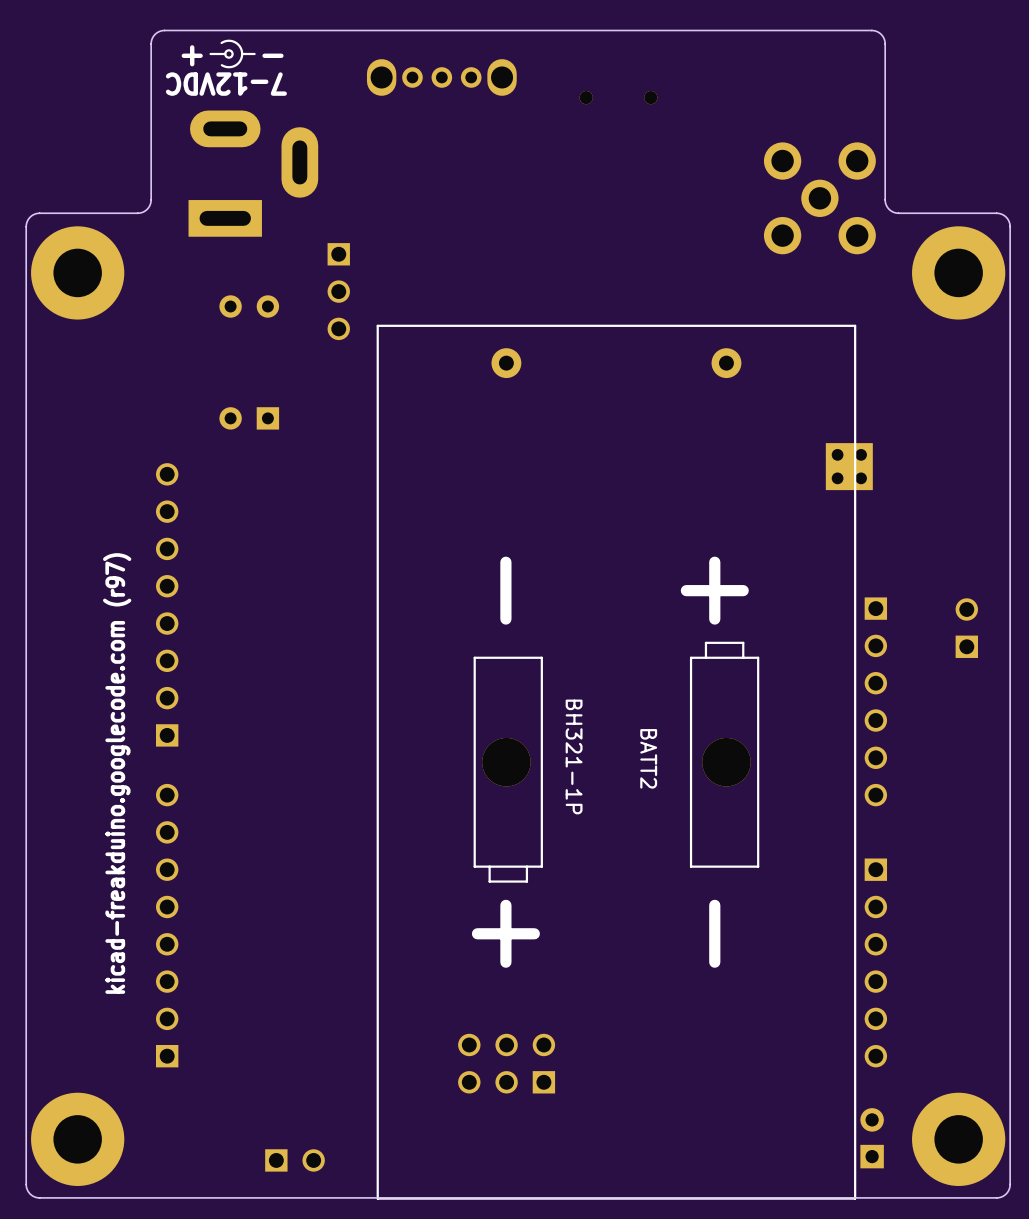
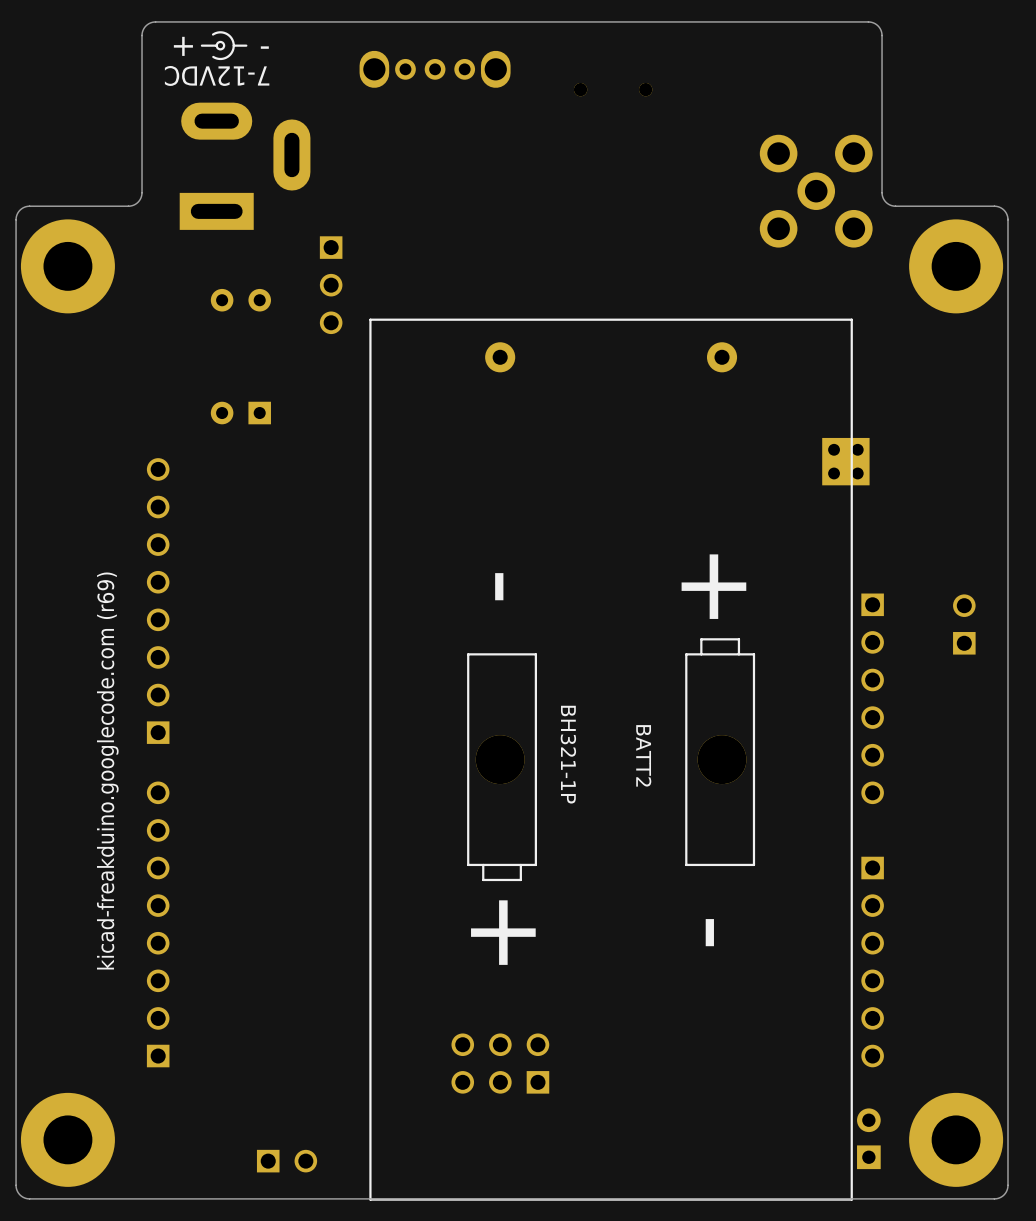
text: kicad-freakduino.googlecode.com (r97) (117, 773) -> kicad-freakduino.googlecode.com (r69) (107, 771)

